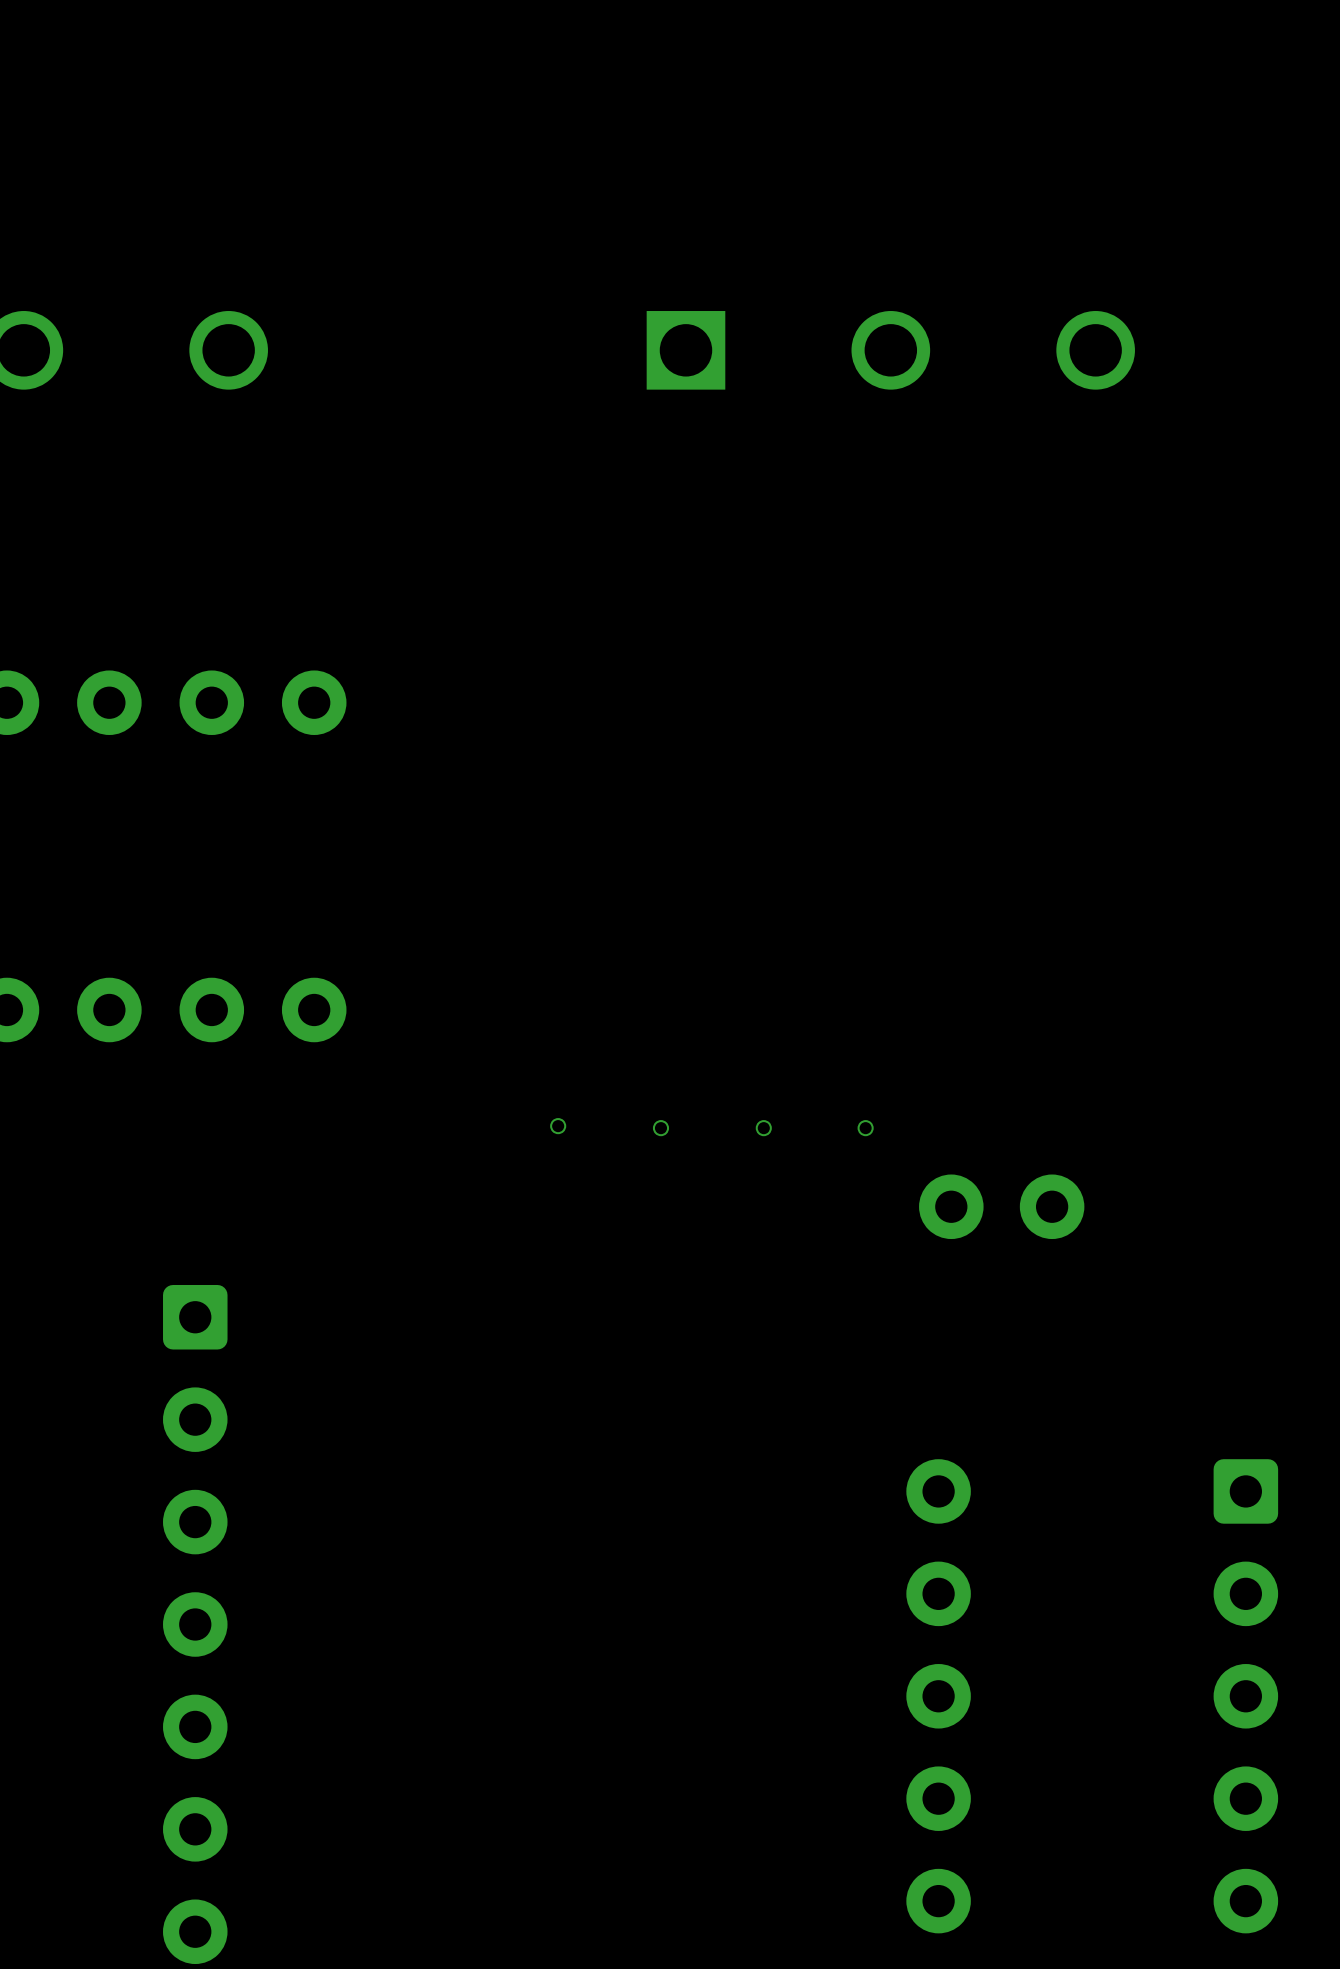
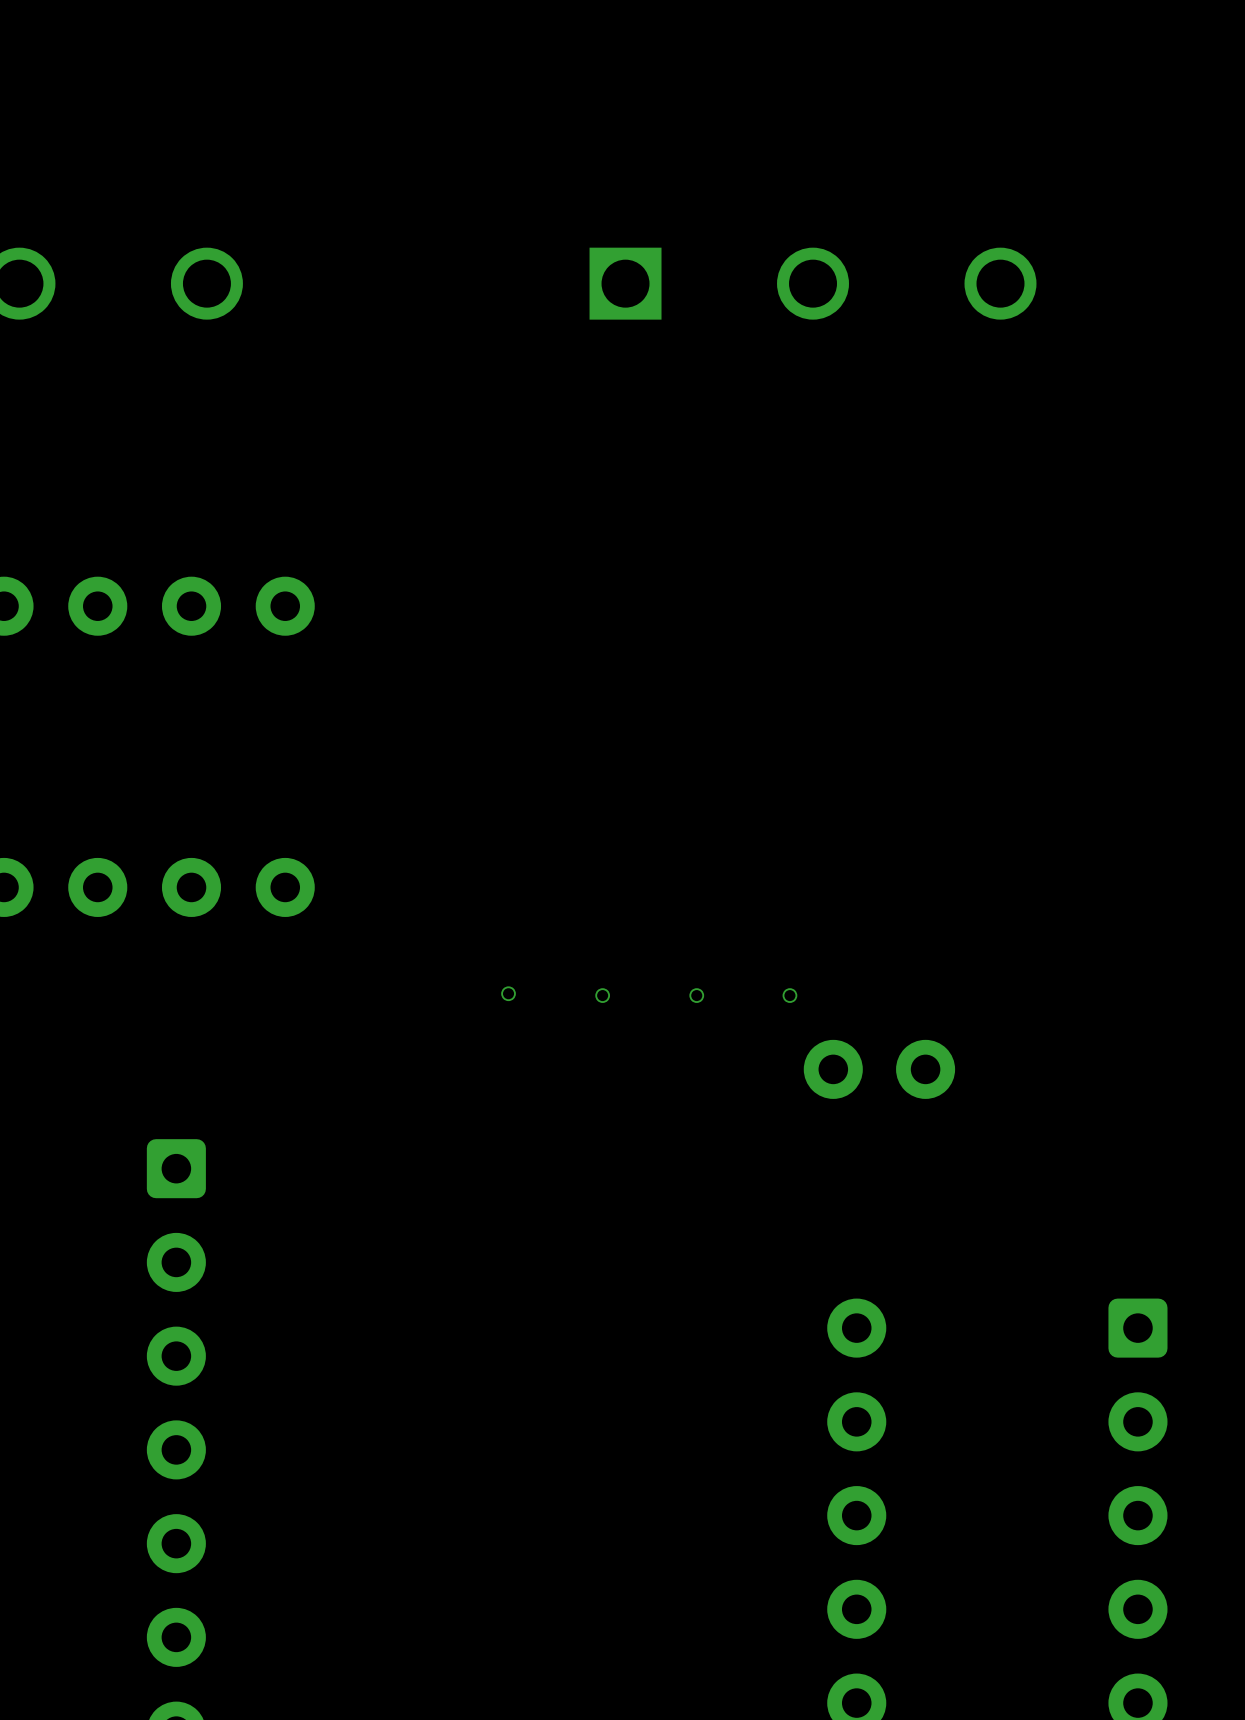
part position: (1001, 1206) -> (879, 1069)

